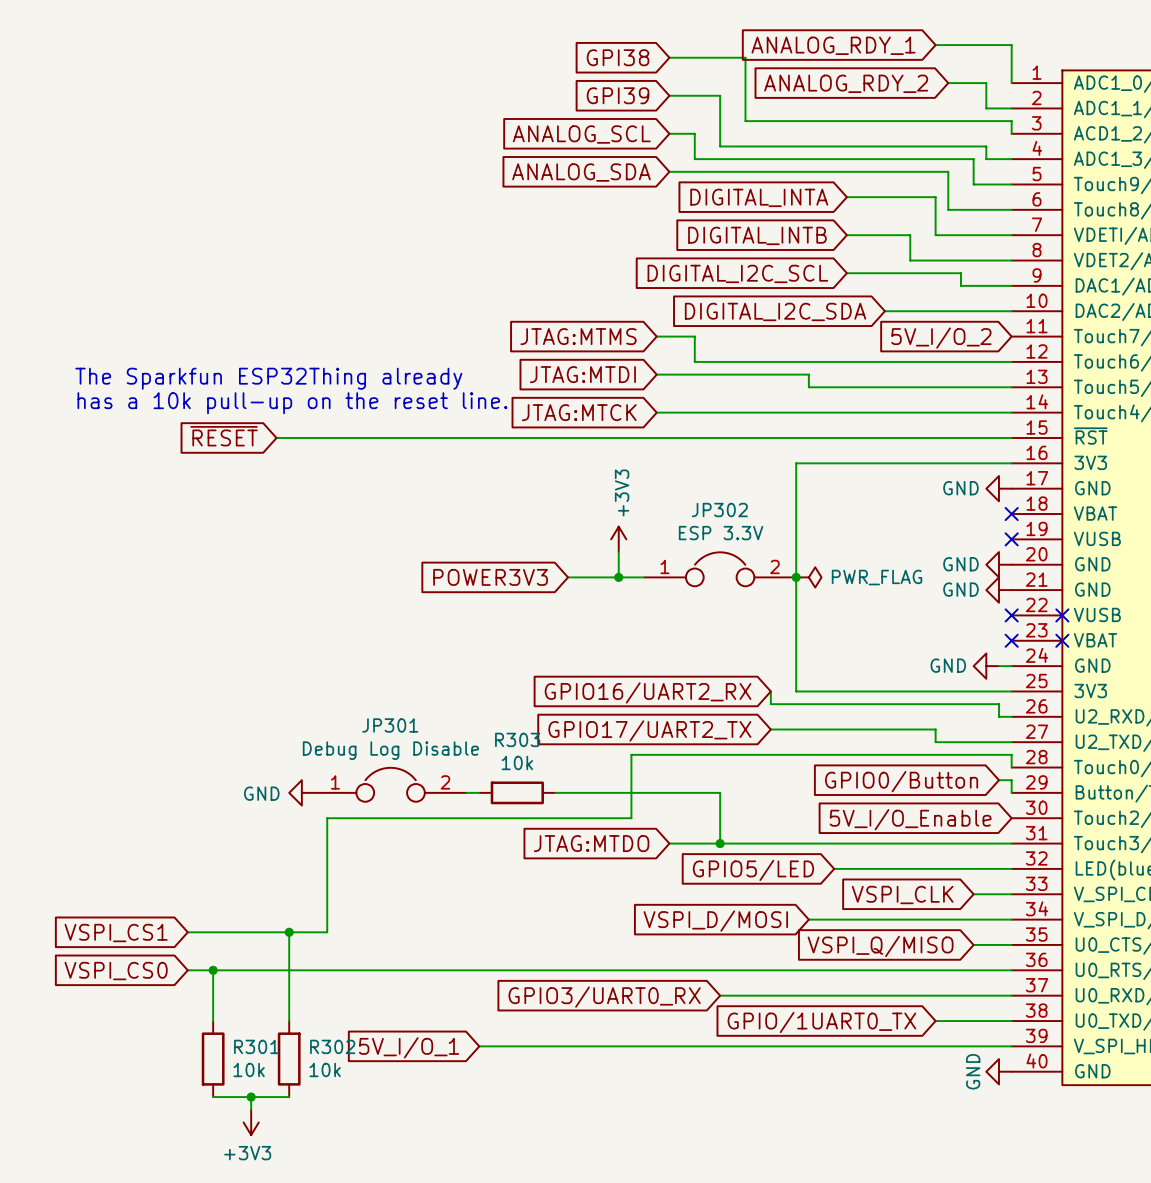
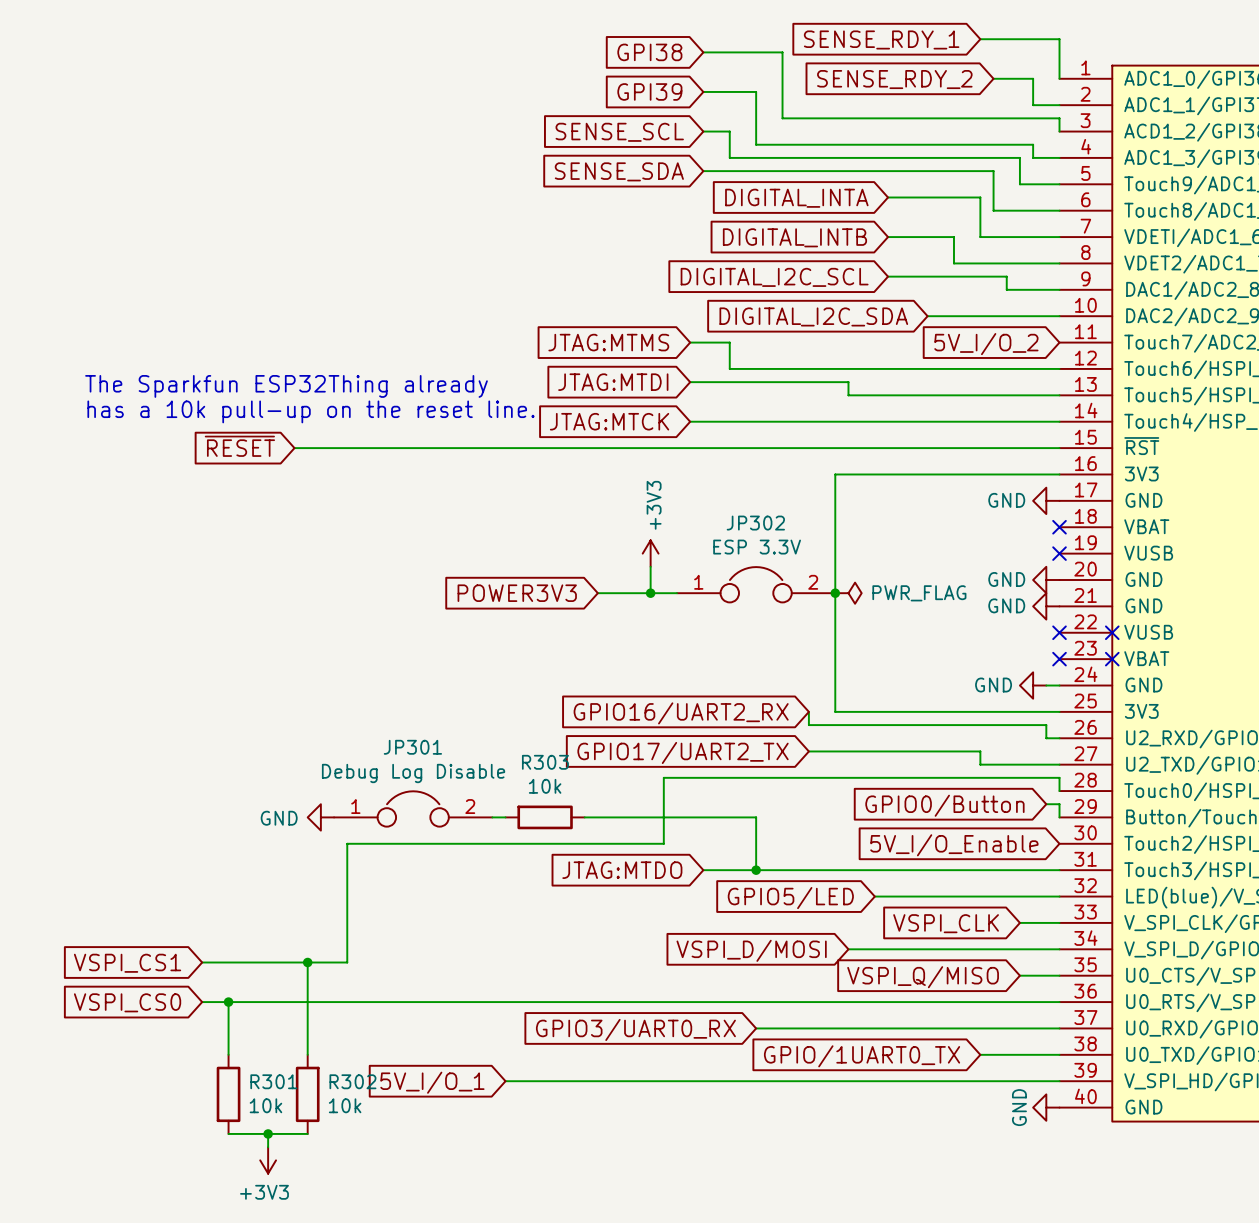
global label: ANALOG_RDY_1 (833, 45) -> SENSE_RDY_1 (881, 39)
global label: ANALOG_RDY_2 (846, 83) -> SENSE_RDY_2 (894, 79)
global label: ANALOG_SCL (581, 134) -> SENSE_SCL (619, 132)
global label: ANALOG_SDA (581, 172) -> SENSE_SDA (619, 171)

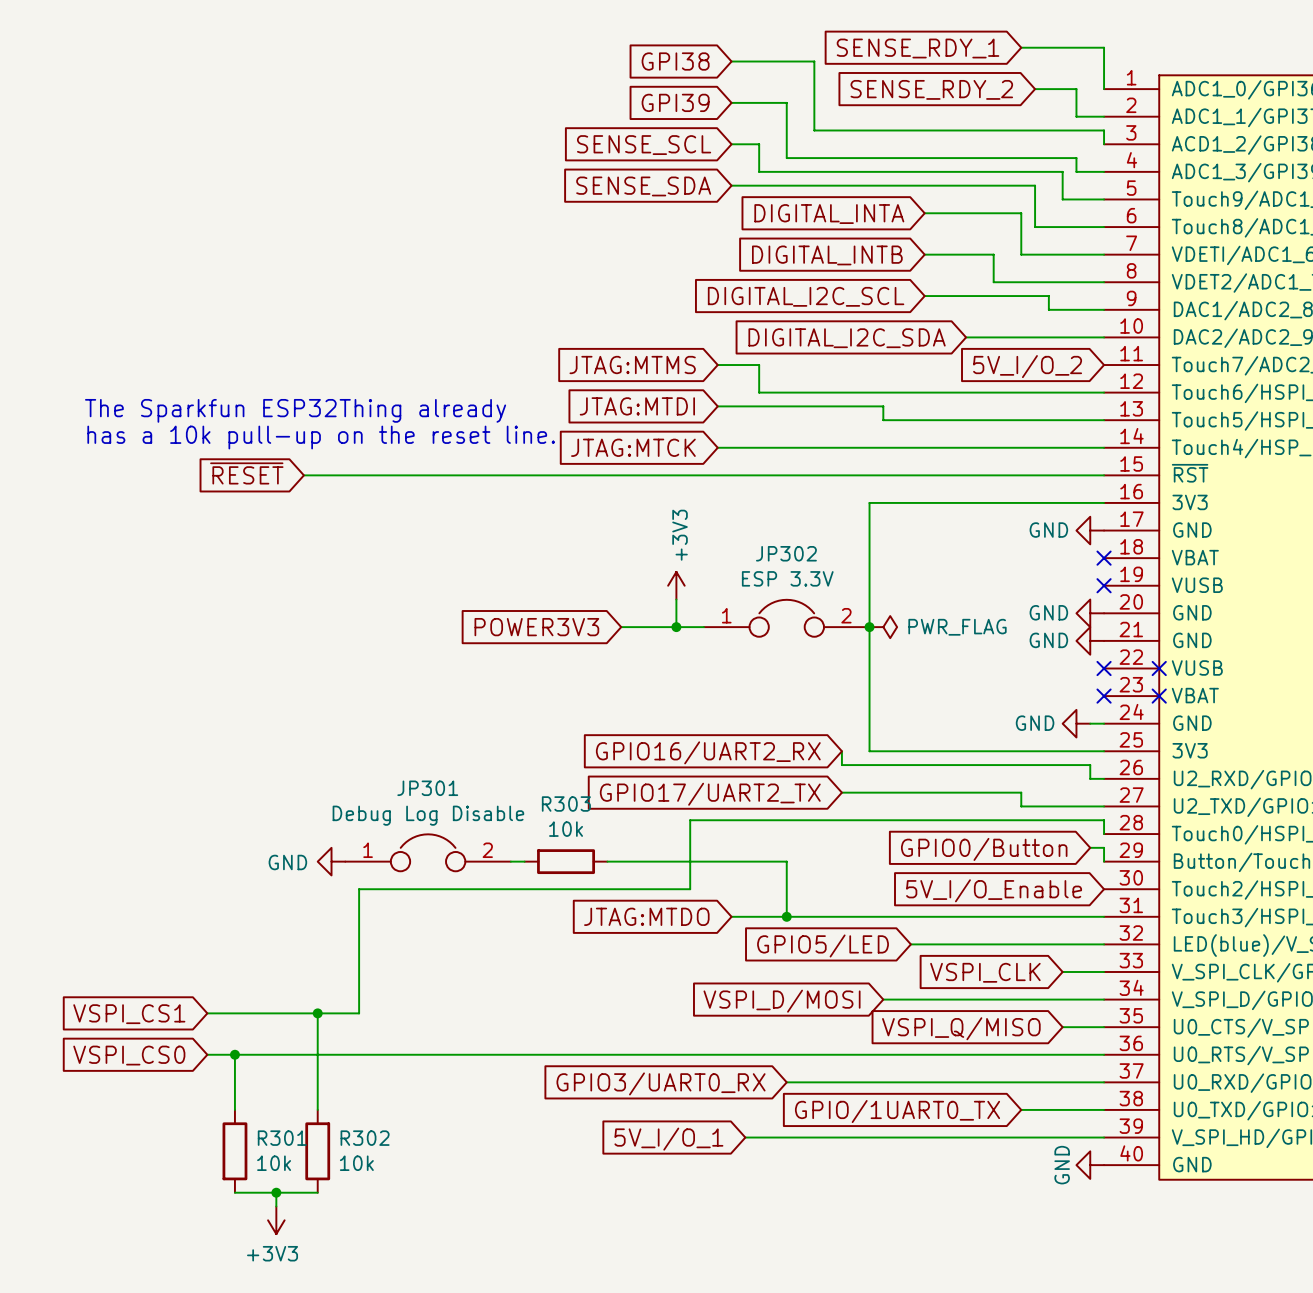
wire: (505, 1081) (716, 1081) -> none
global label position: 5V_I/O_1 (432, 1082) -> 5V_I/O_1 (668, 1139)

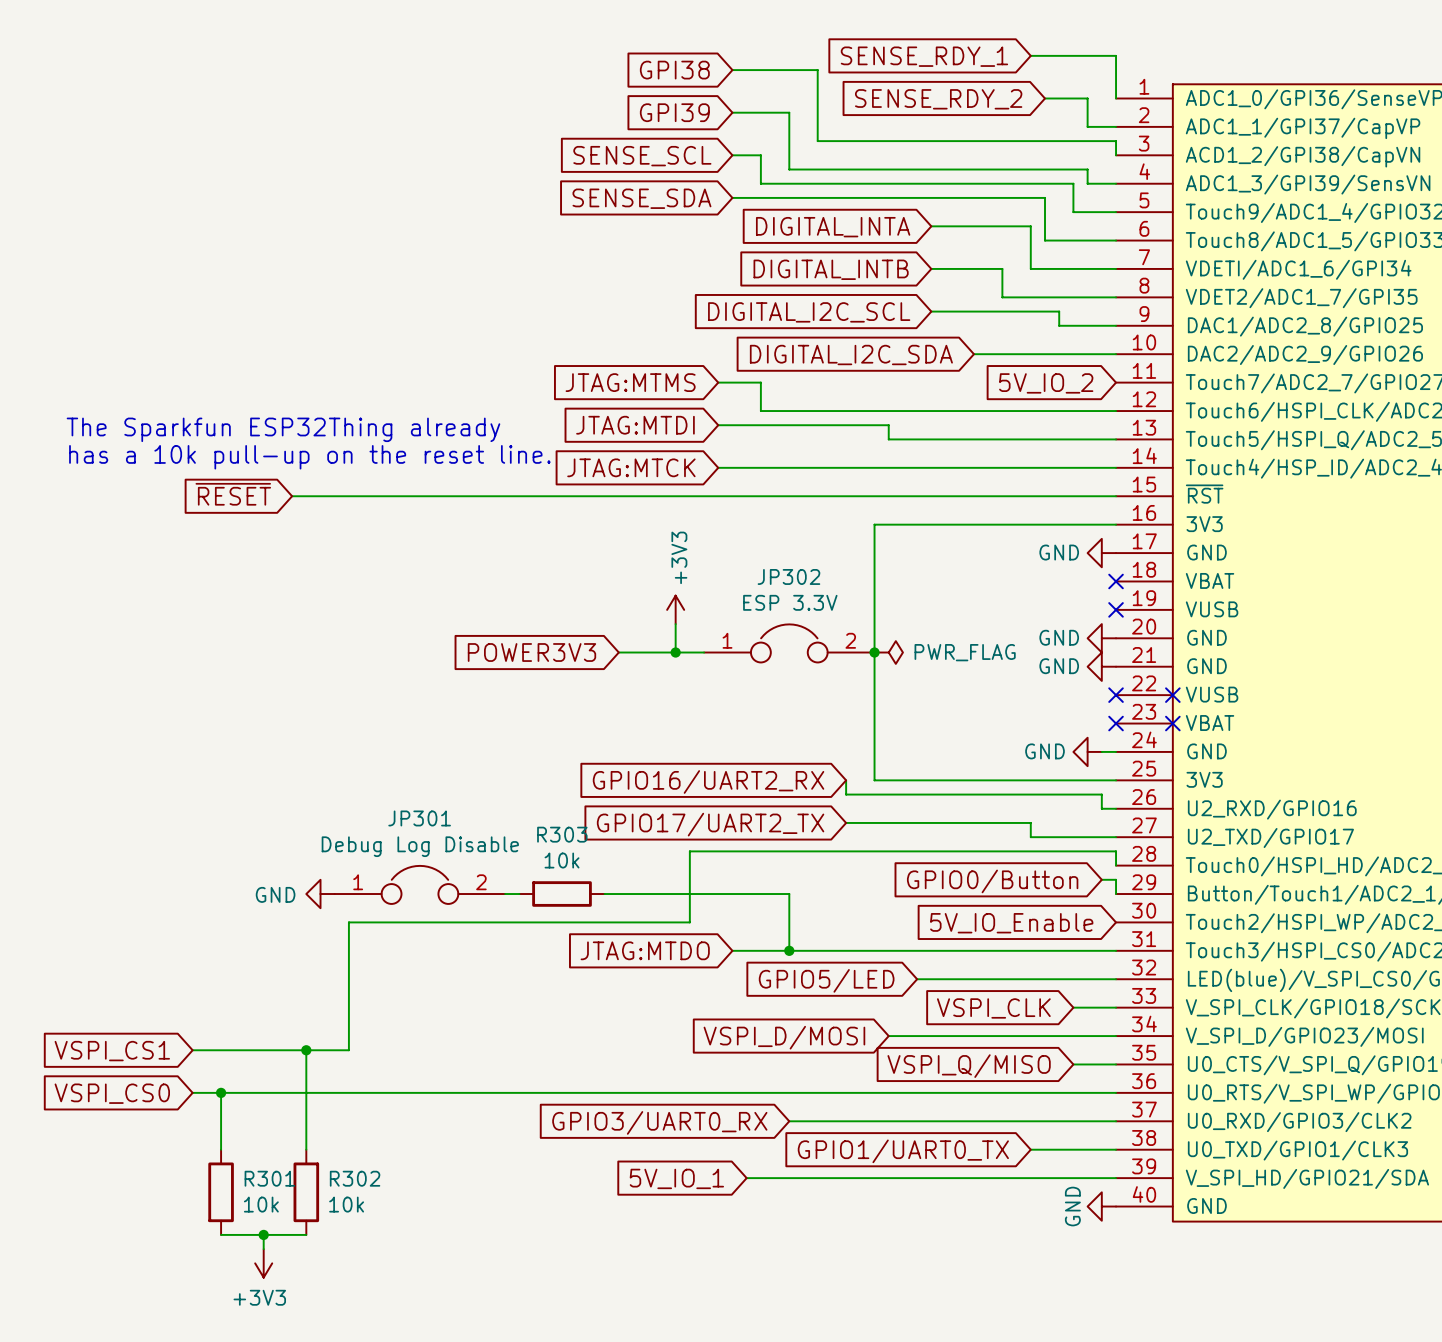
global label: 5V_I/O_2 (1027, 366) -> 5V_IO_2 (1046, 383)
global label: 5V_I/O_Enable (994, 890) -> 5V_IO_Enable (1011, 923)
global label: GPIO/1UART0_TX (897, 1111) -> GPIO1/UART0_TX (903, 1151)
global label: 5V_I/O_1 (668, 1139) -> 5V_IO_1 (676, 1178)

